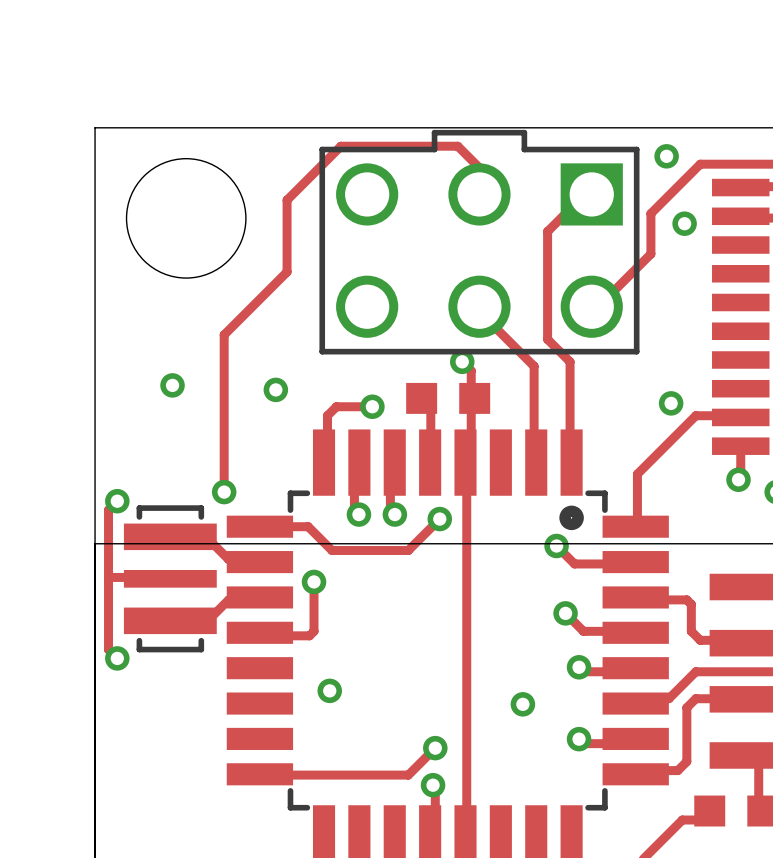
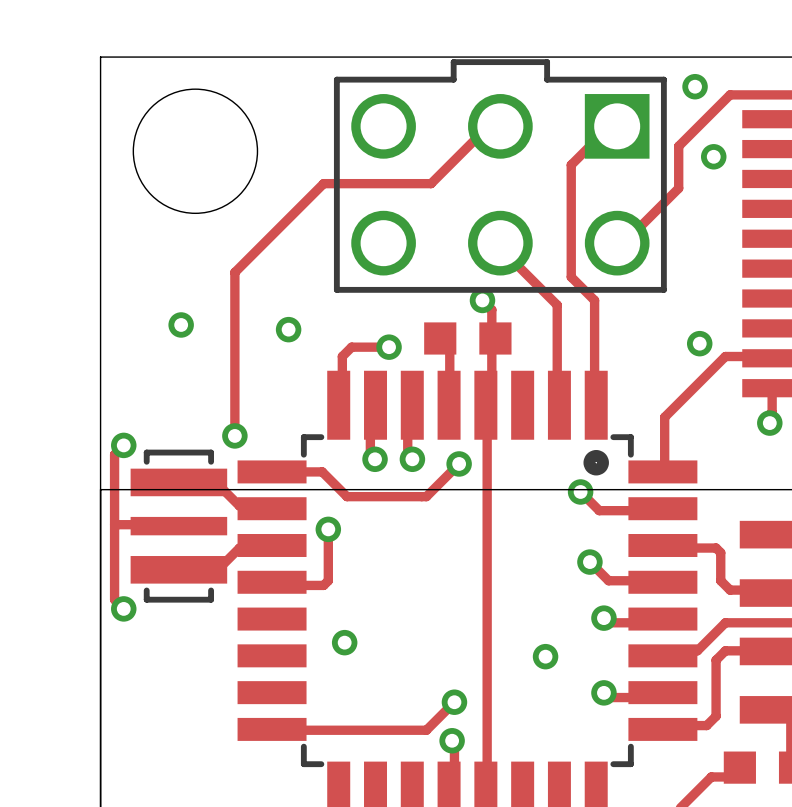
track: (480, 193) (480, 168) (457, 146) (340, 146) (287, 200) (287, 271) -> (500, 126) (488, 126) (431, 183) (323, 183) (300, 207)

